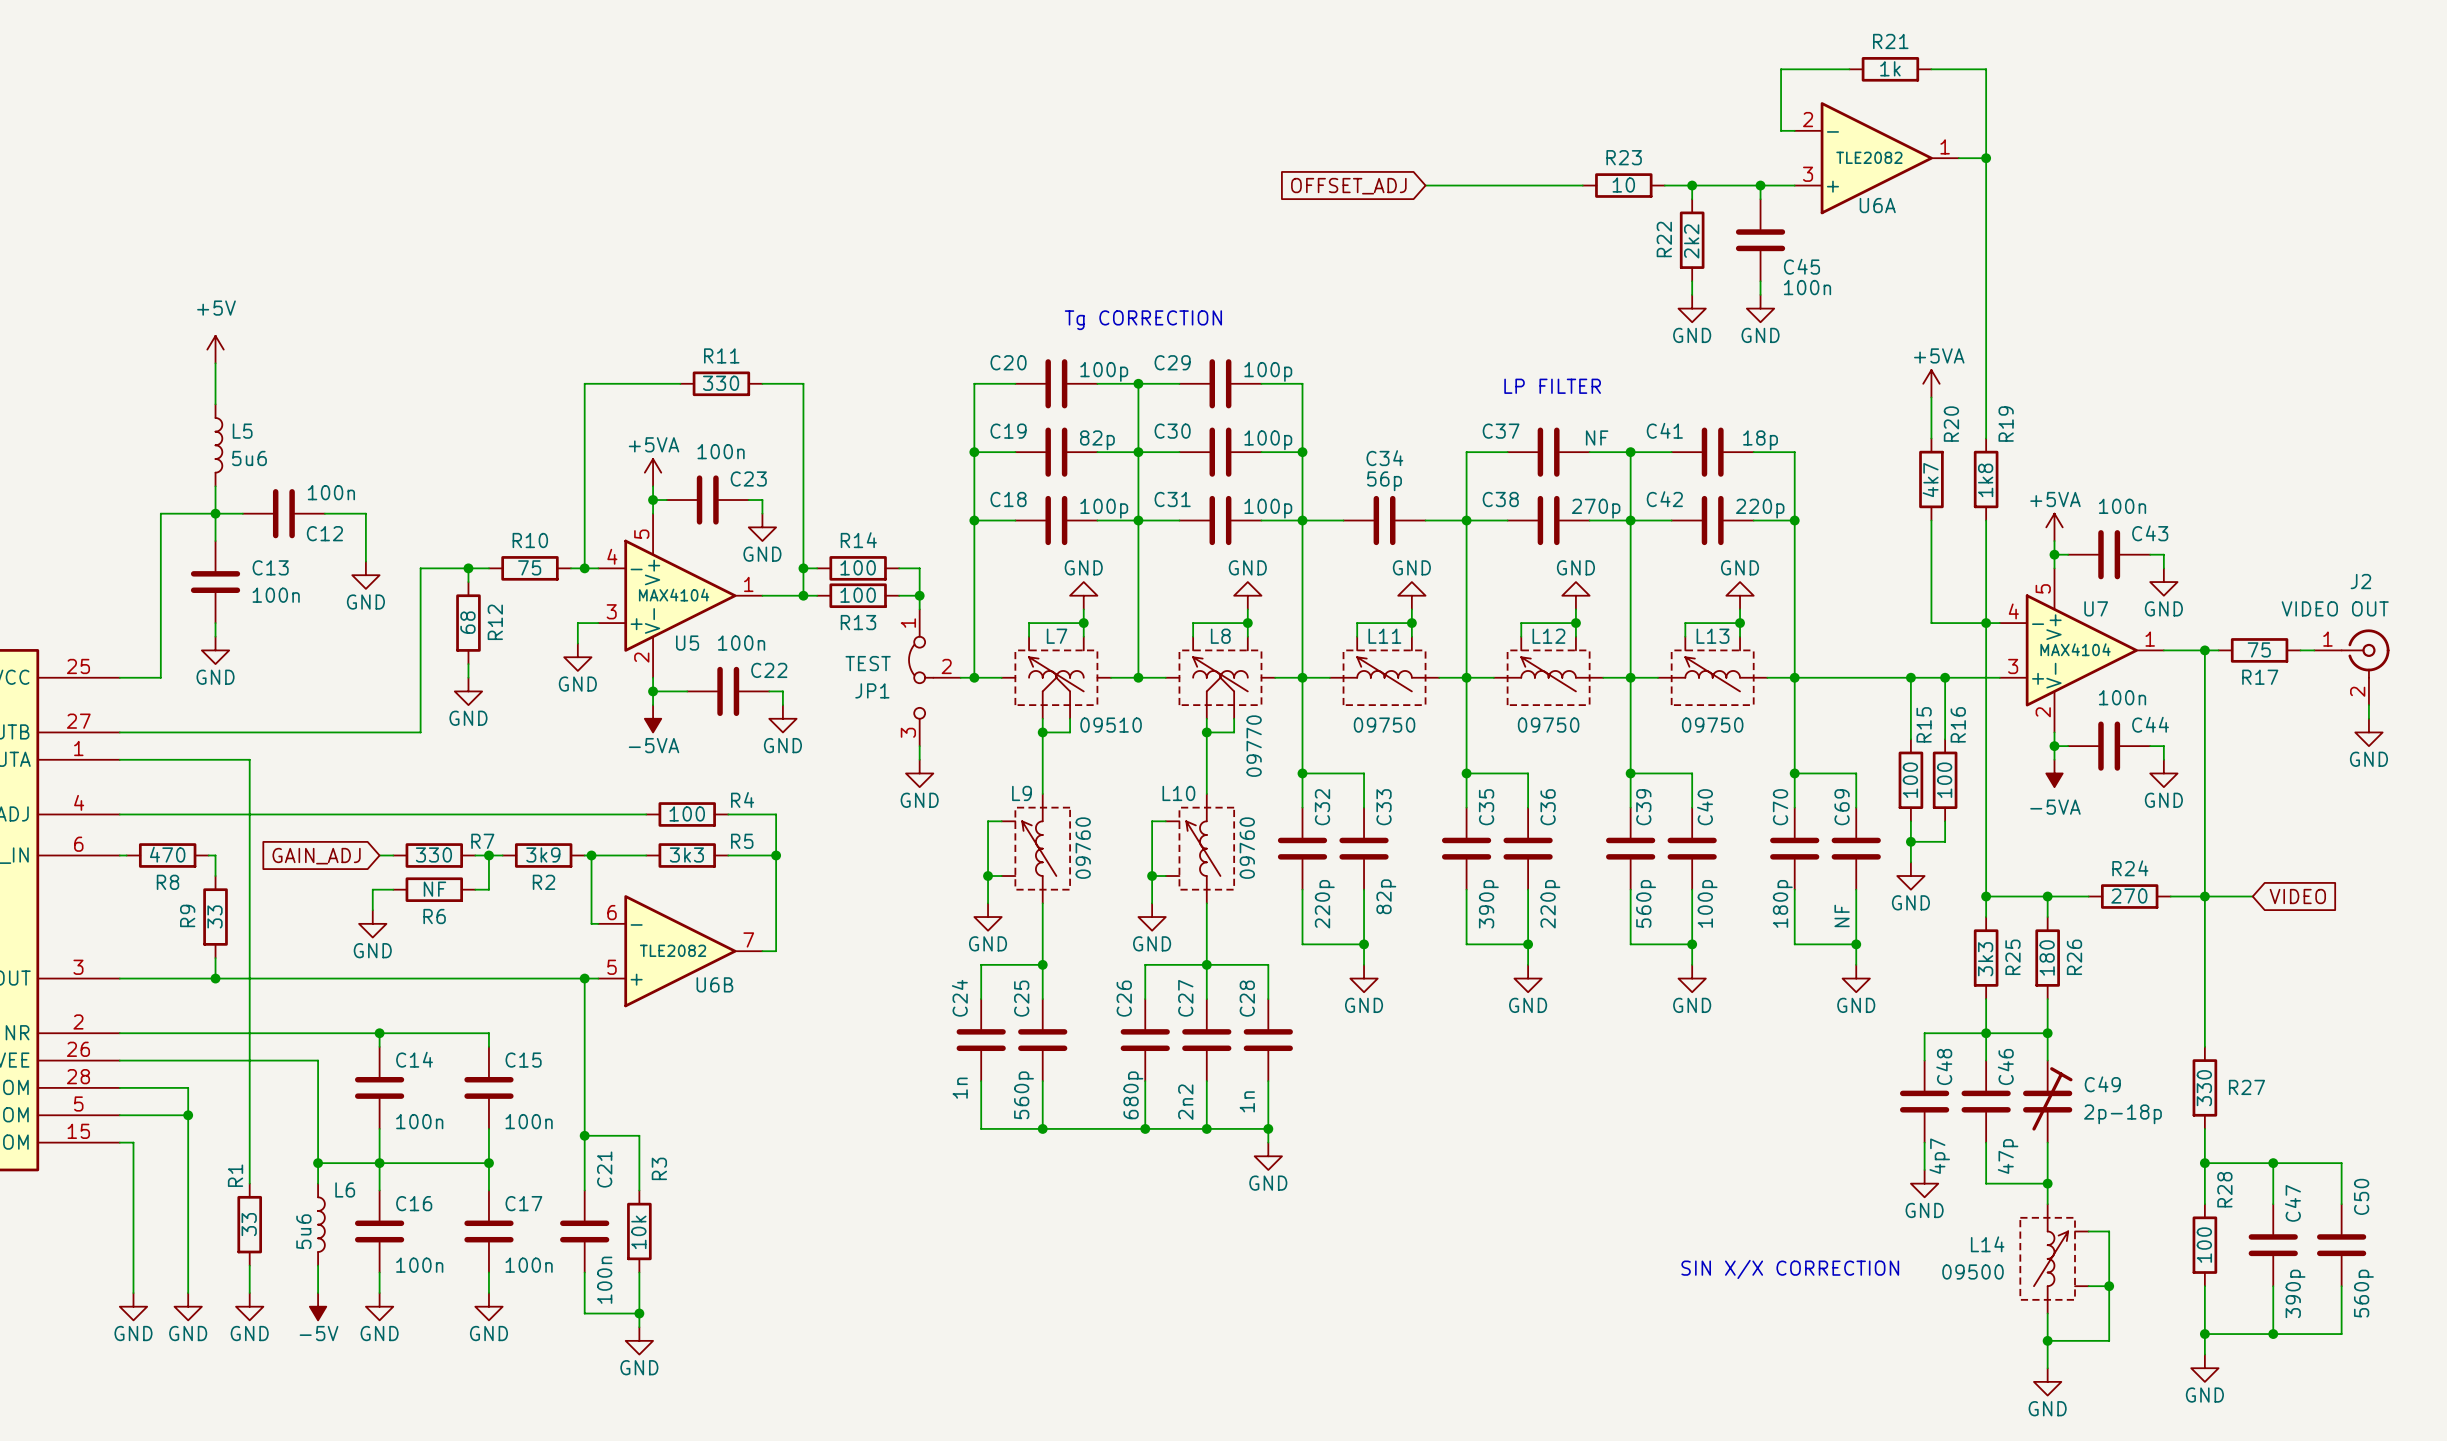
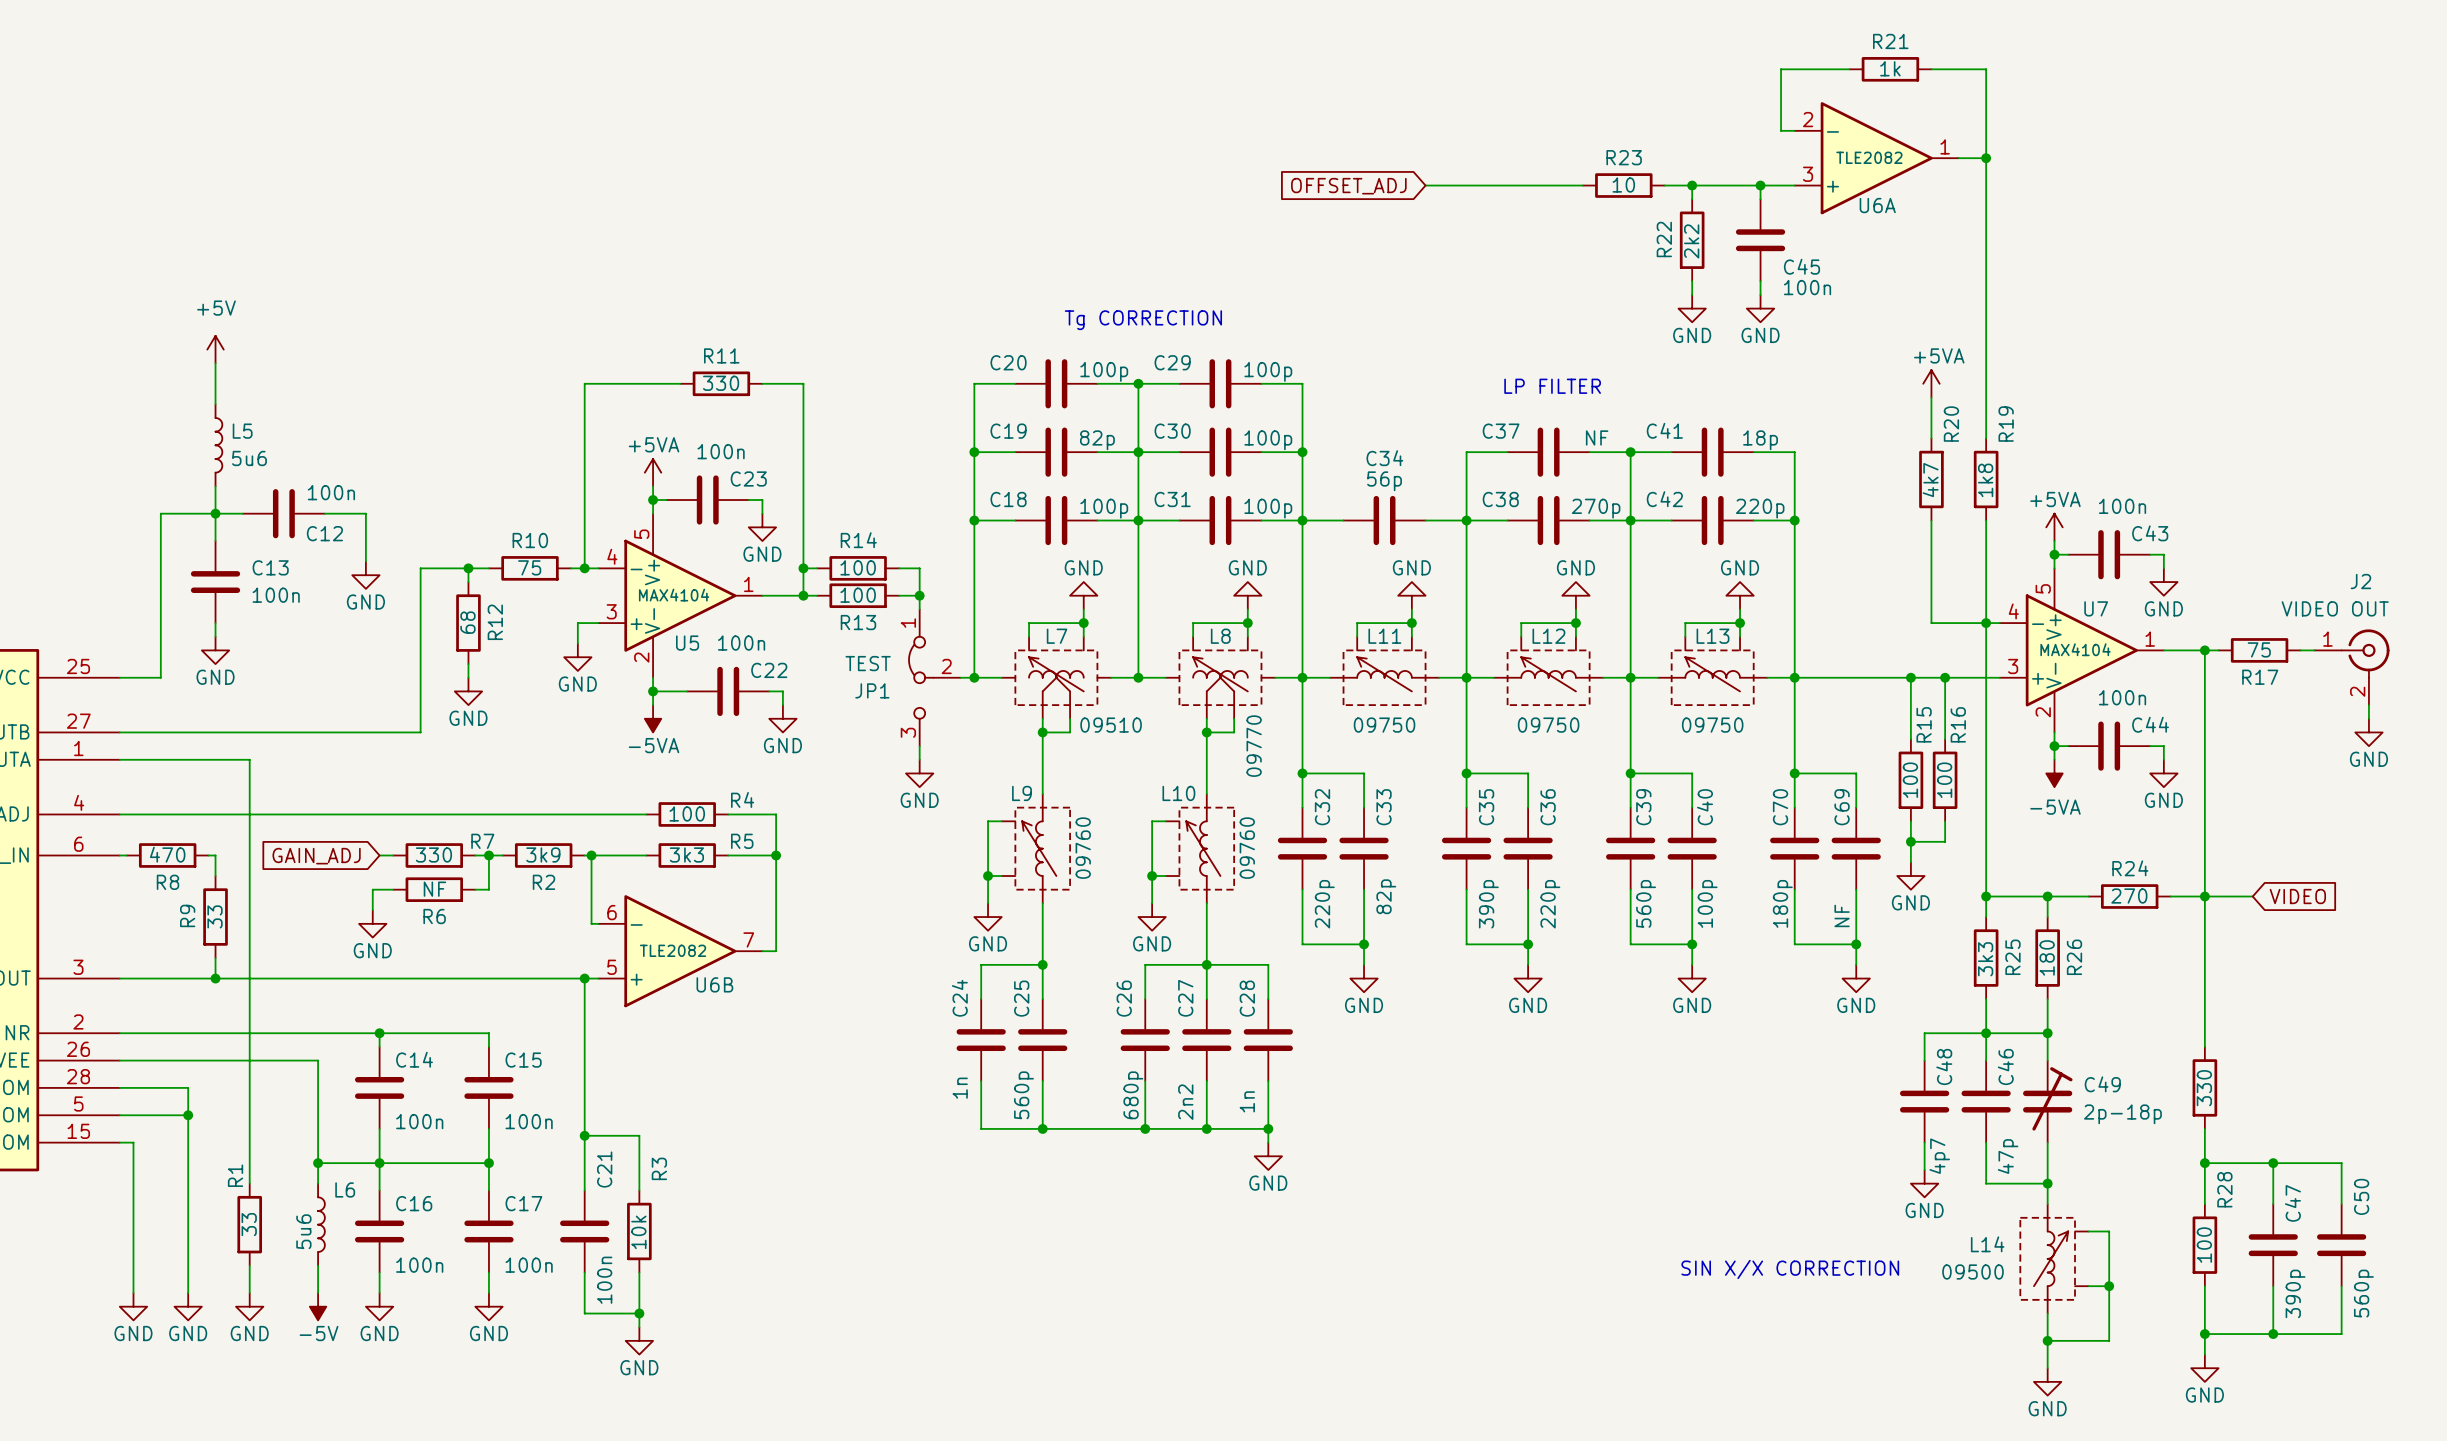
R27 name: R27 (2246, 1087) -> none

